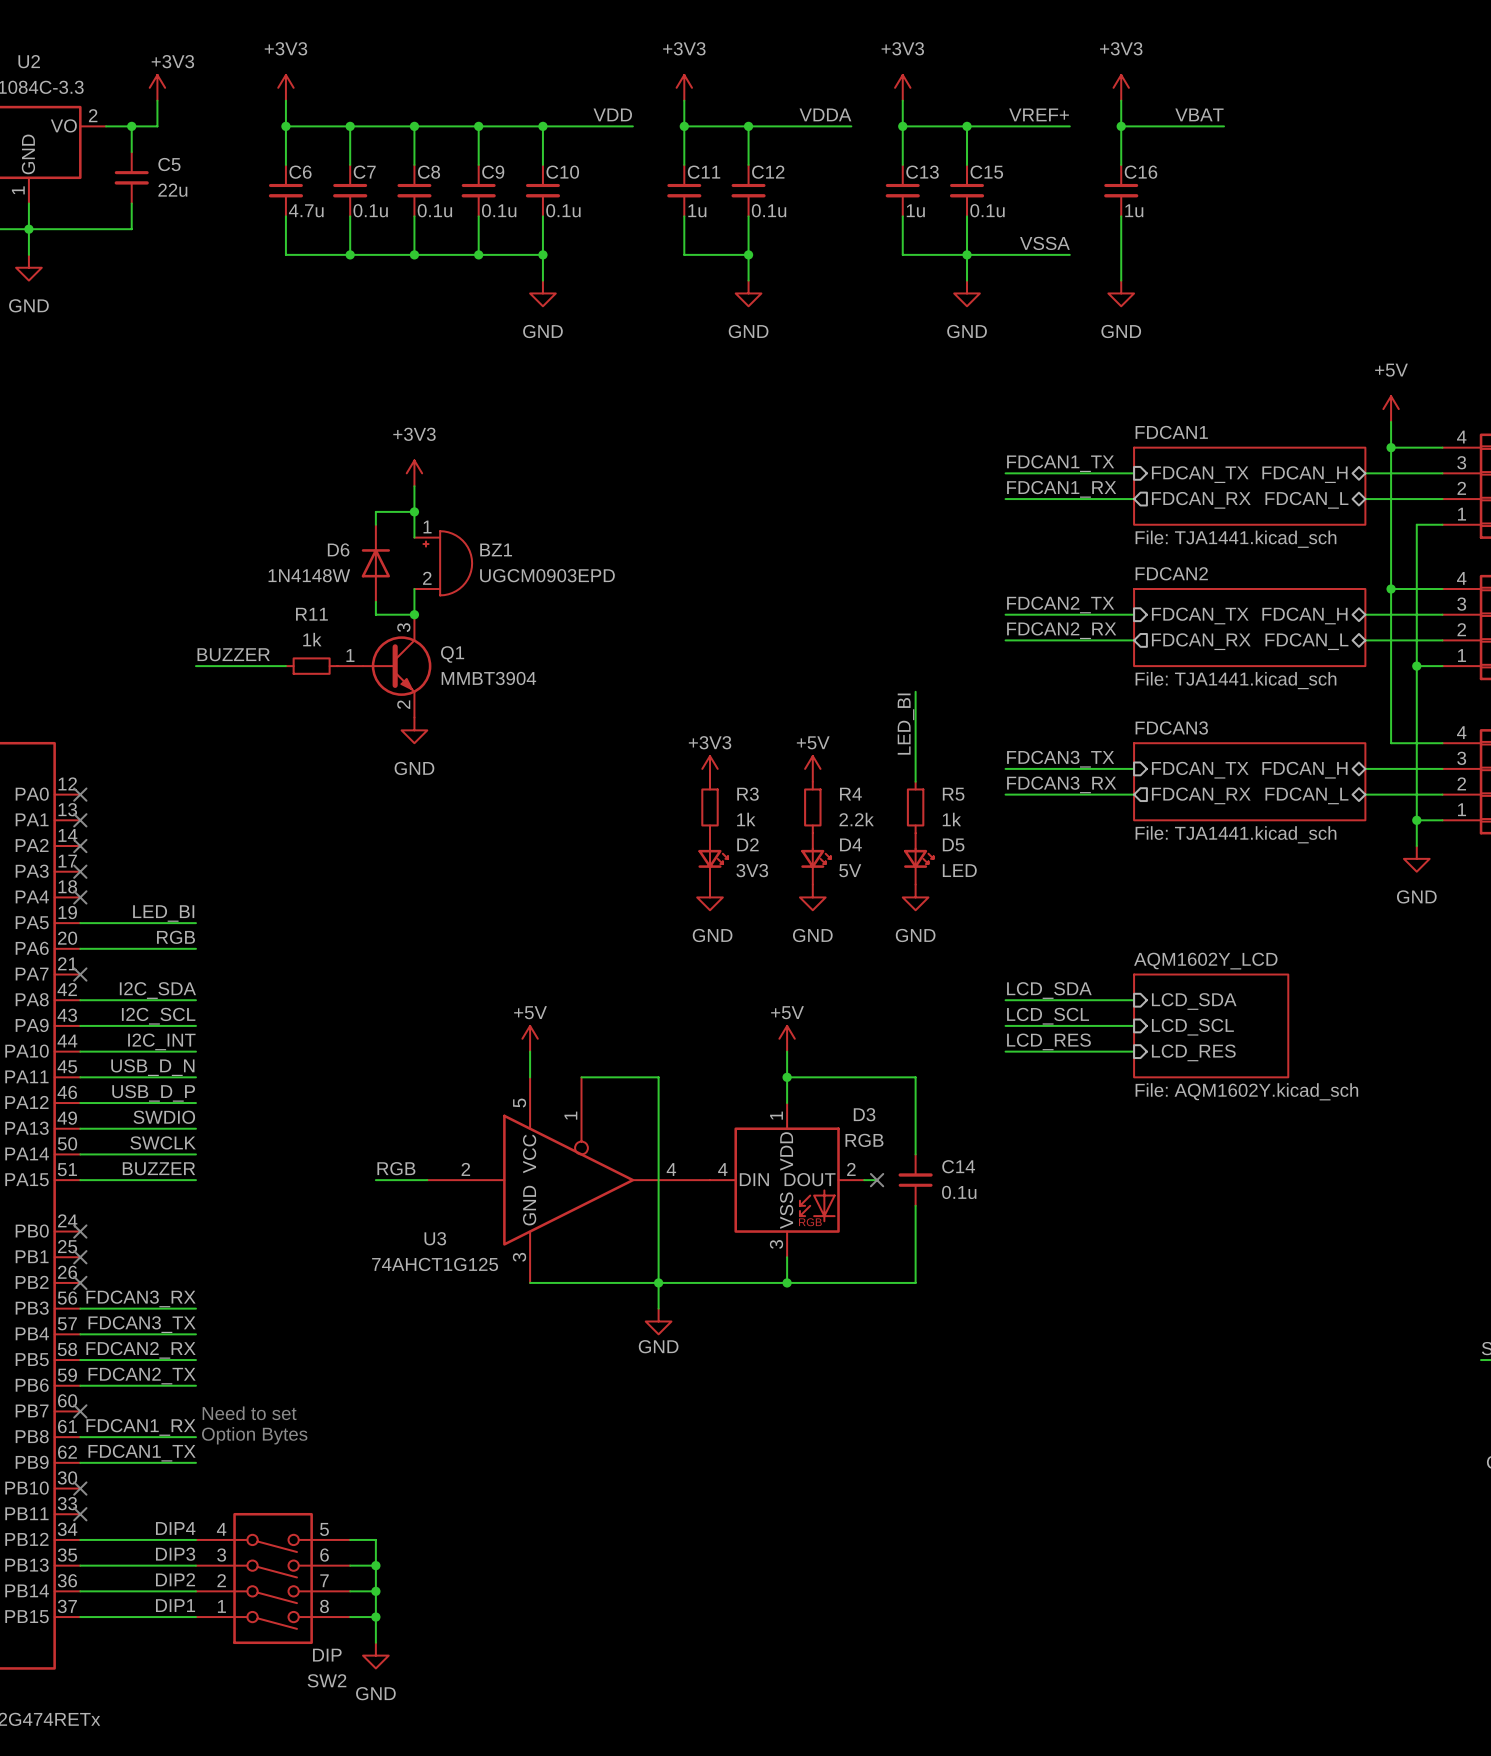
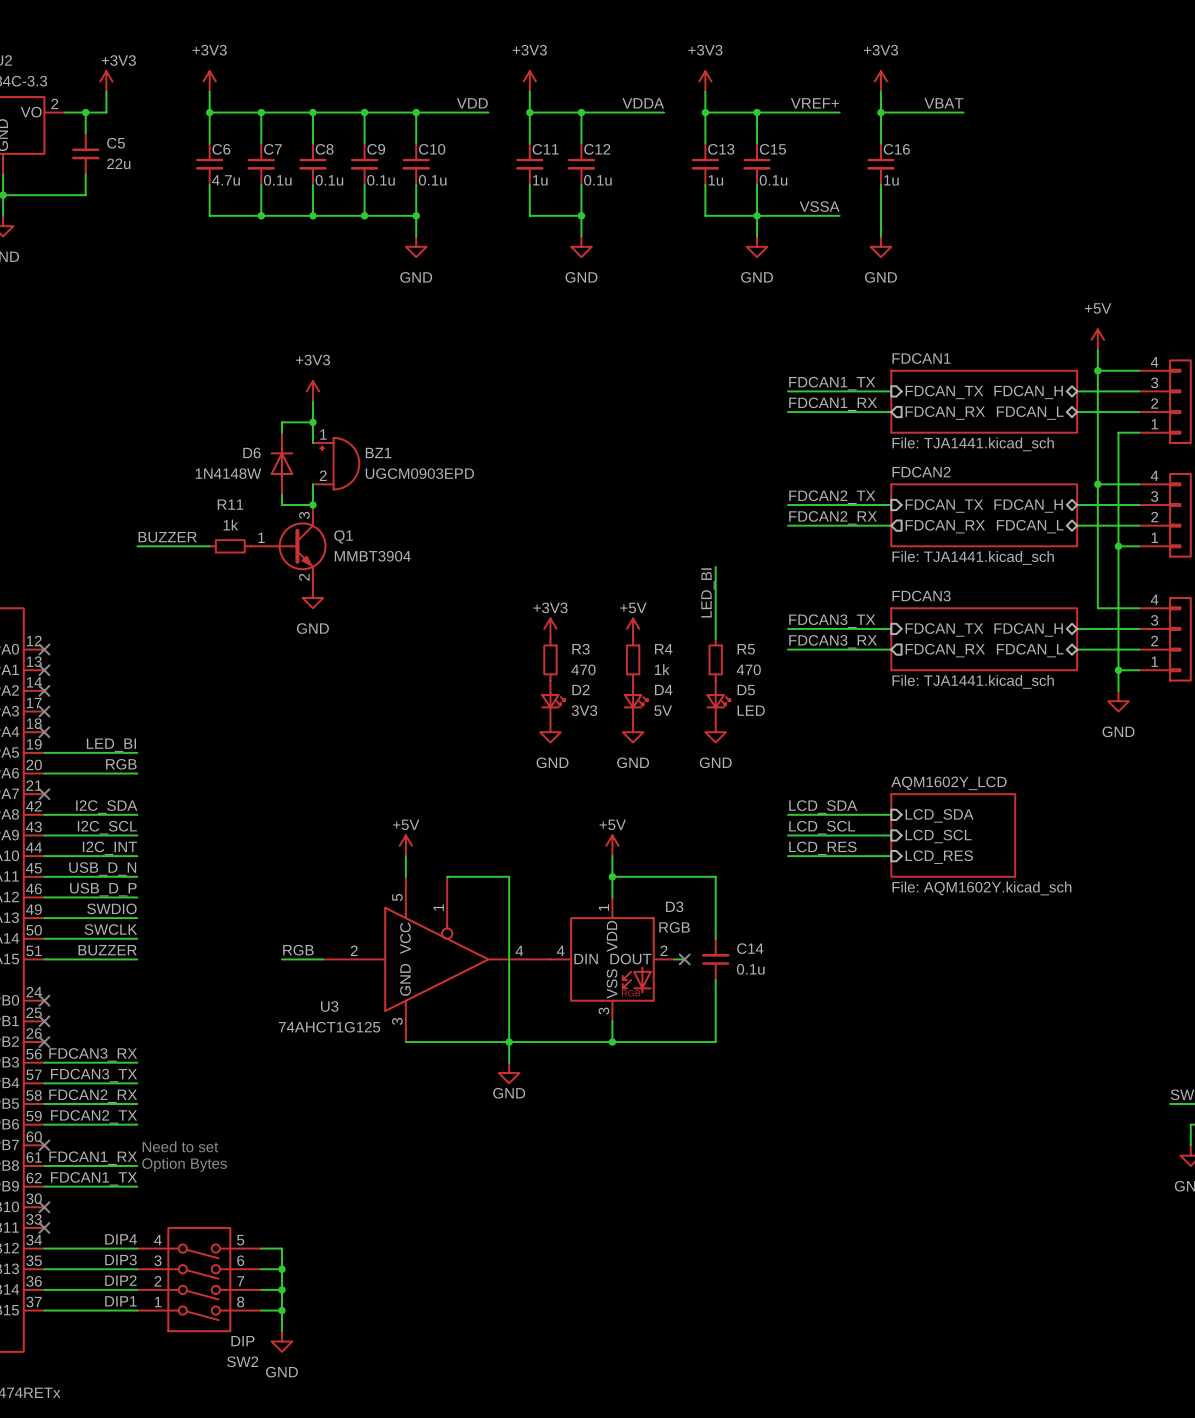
R3 value: 1k (746, 819) -> 470 (583, 669)
R4 value: 2.2k (856, 819) -> 1k (662, 669)
R5 value: 1k (951, 819) -> 470 (748, 669)

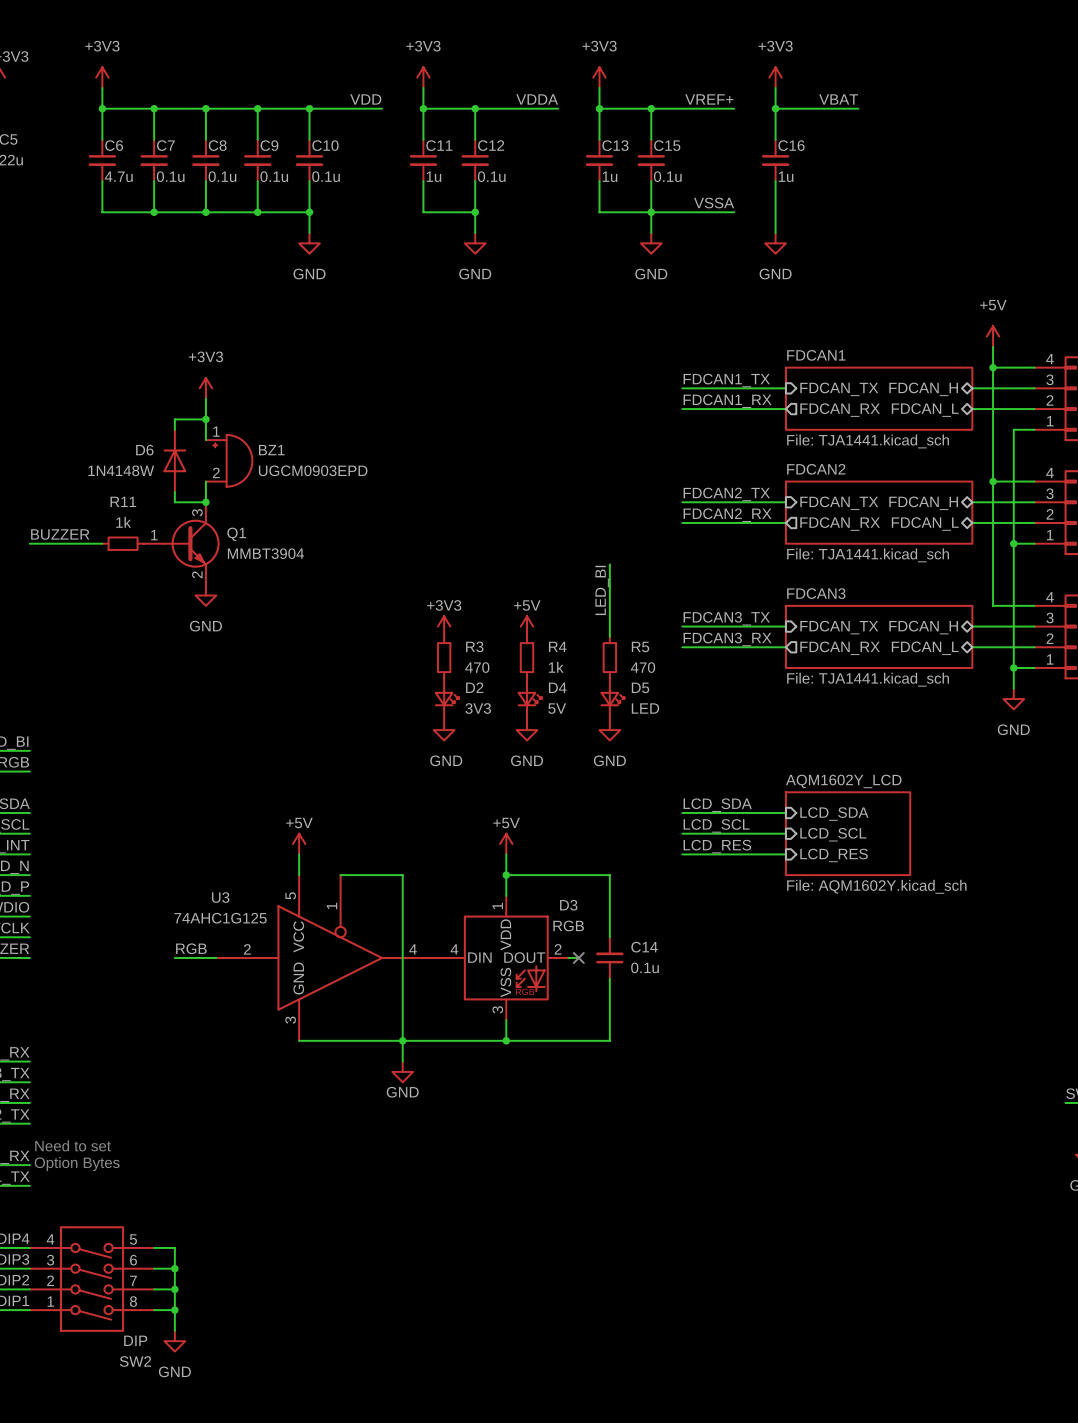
U3 name position: U3 (329, 1006) -> U3 (220, 897)
U3 value: 74AHCT1G125 (329, 1027) -> 74AHC1G125 (220, 918)

